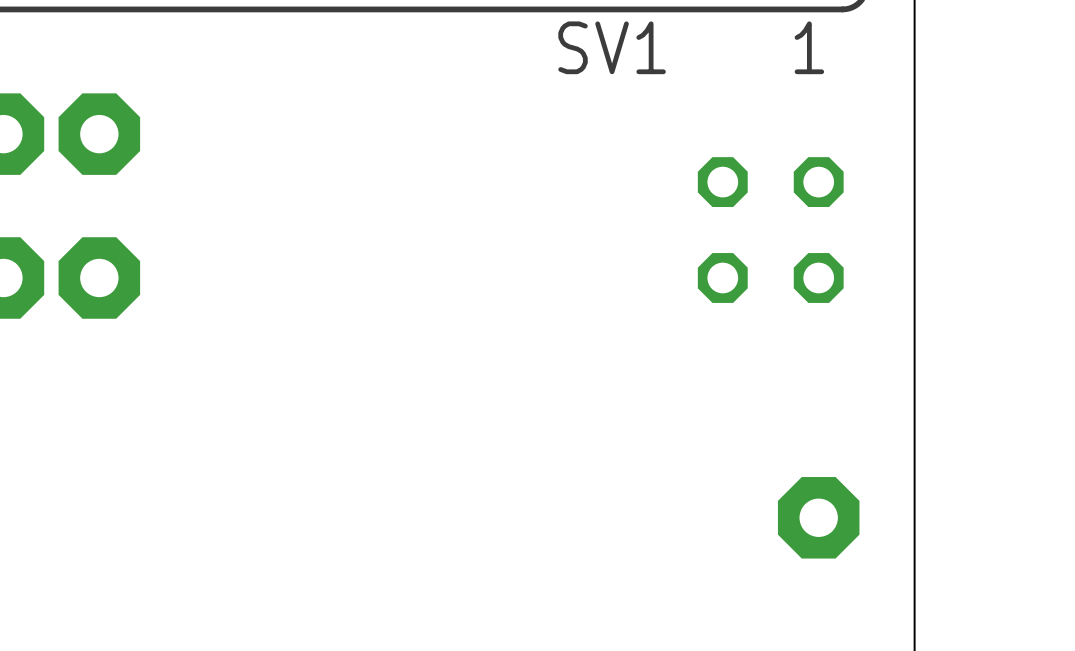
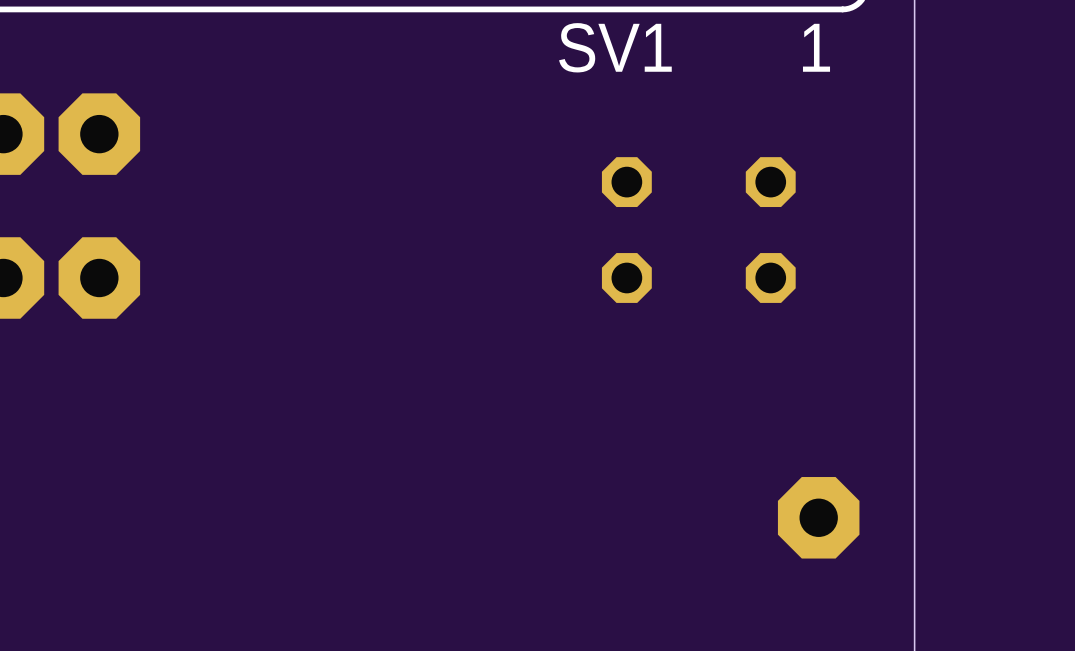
part: none -> (626, 230)
part: (722, 230) -> none
part: none -> (770, 230)
part: (818, 230) -> none

